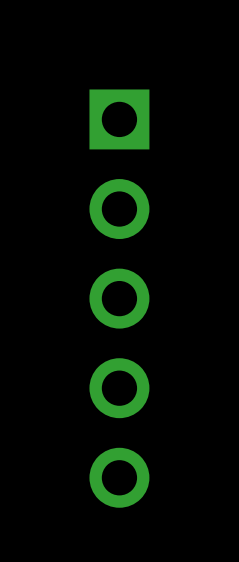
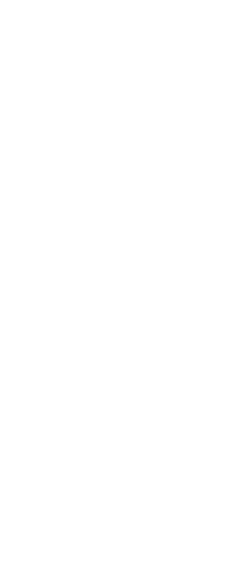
part: (119, 298) -> none

